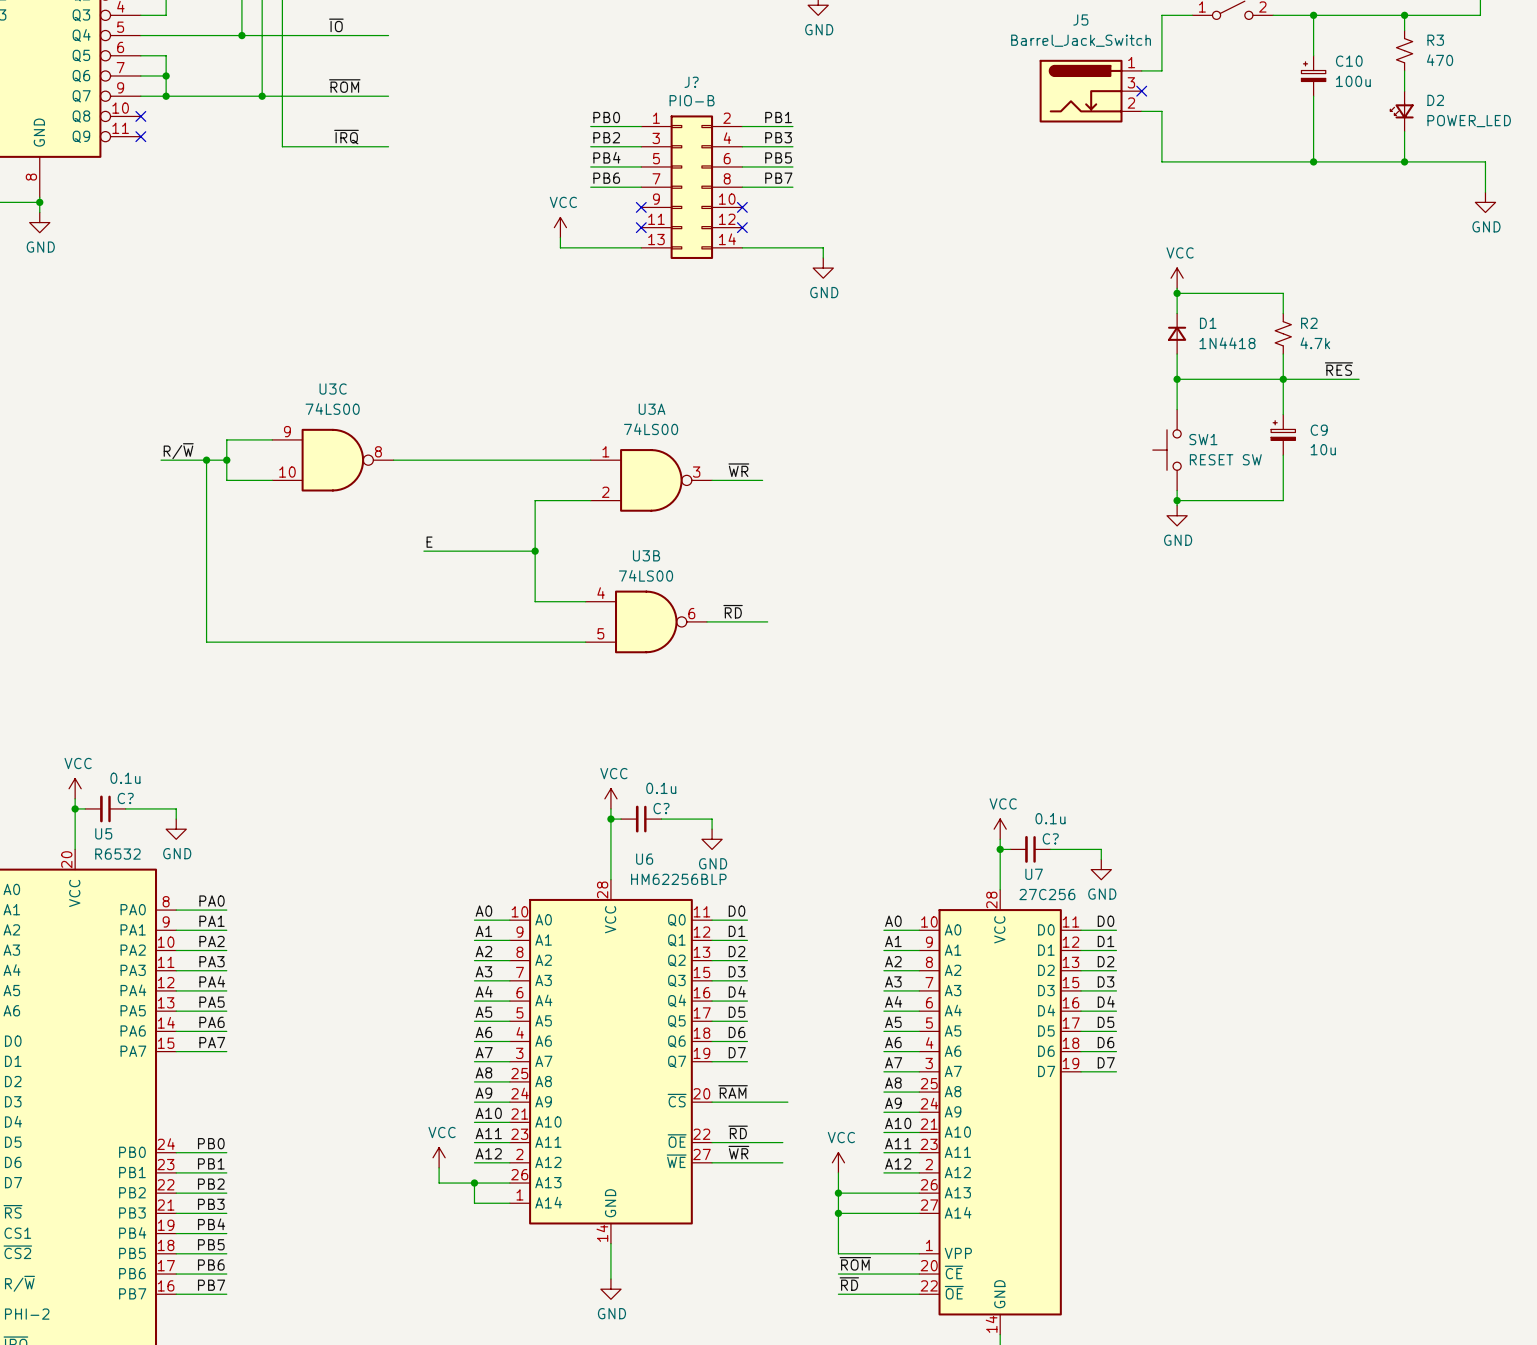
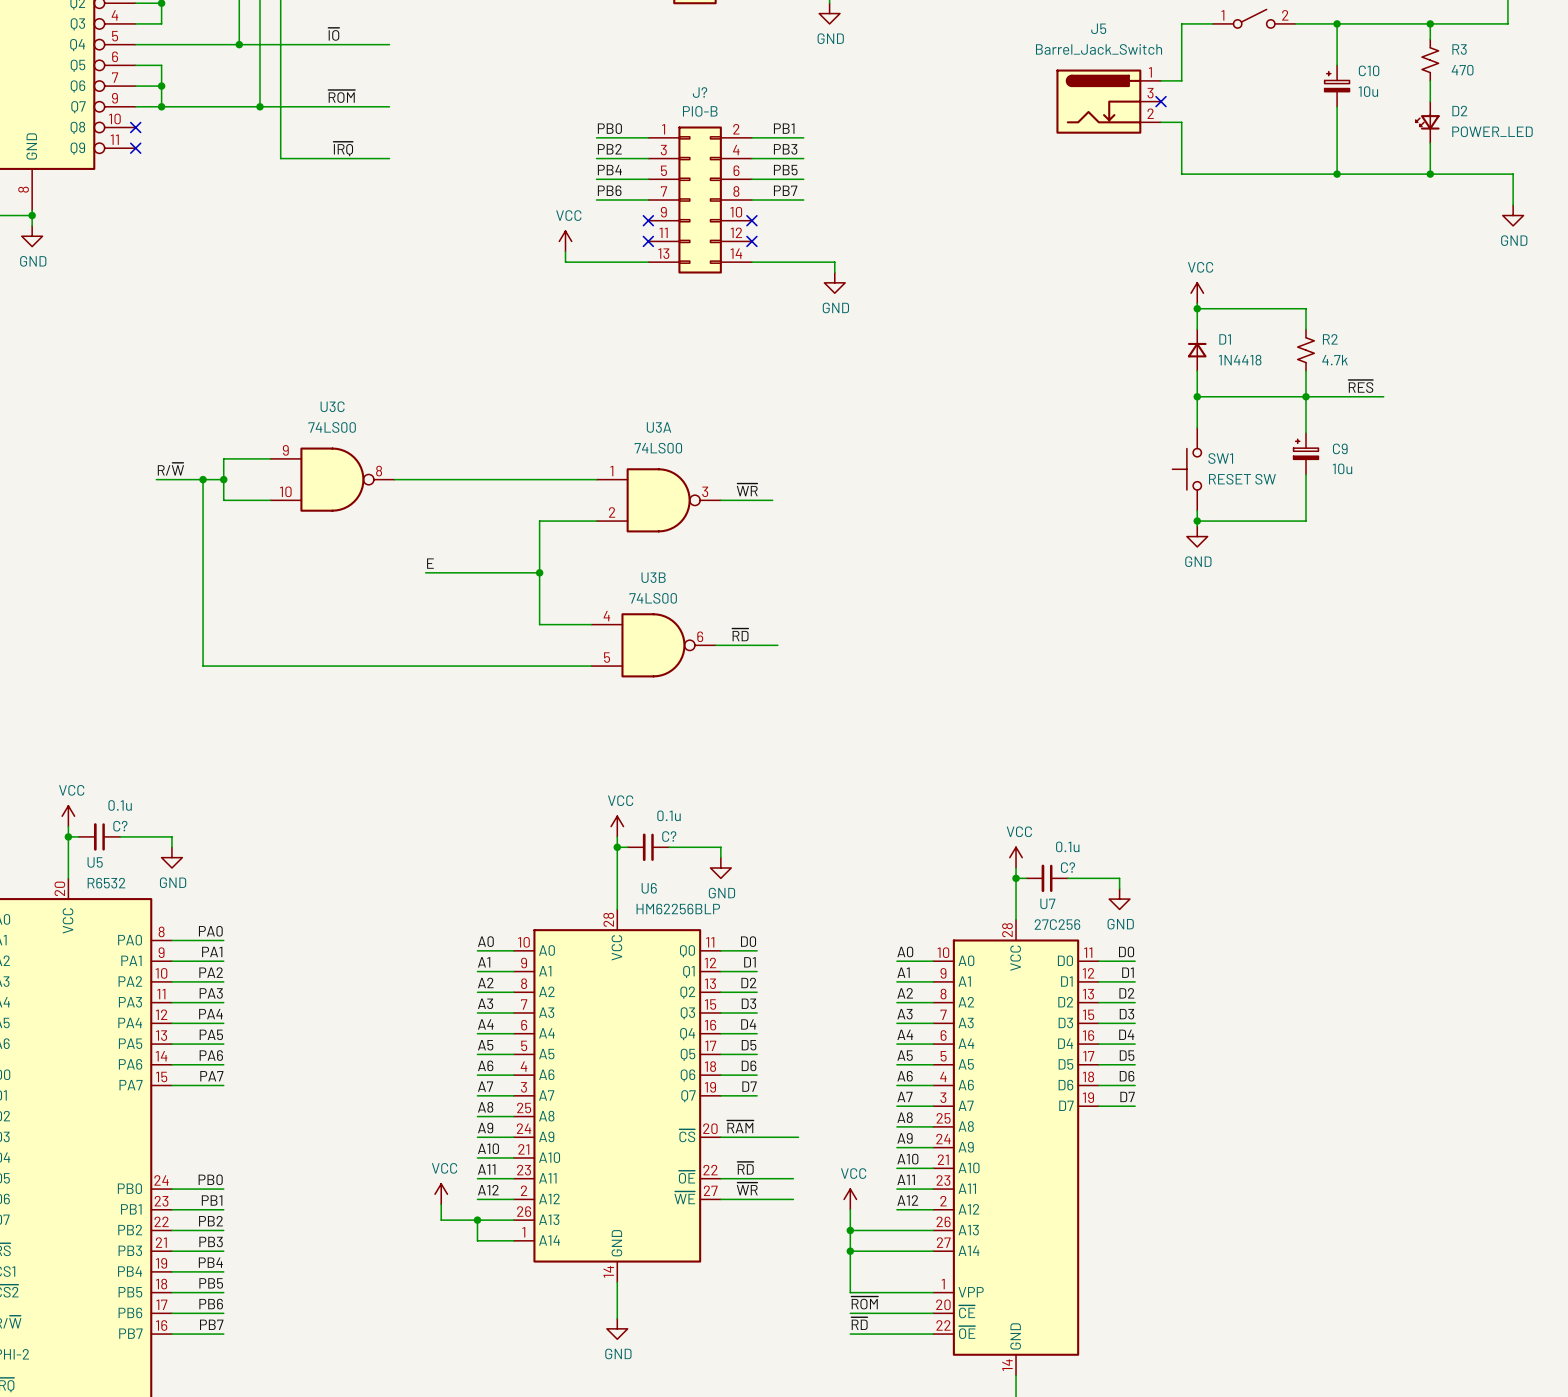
C10 value: 100u (1353, 81) -> 10u (1368, 91)

